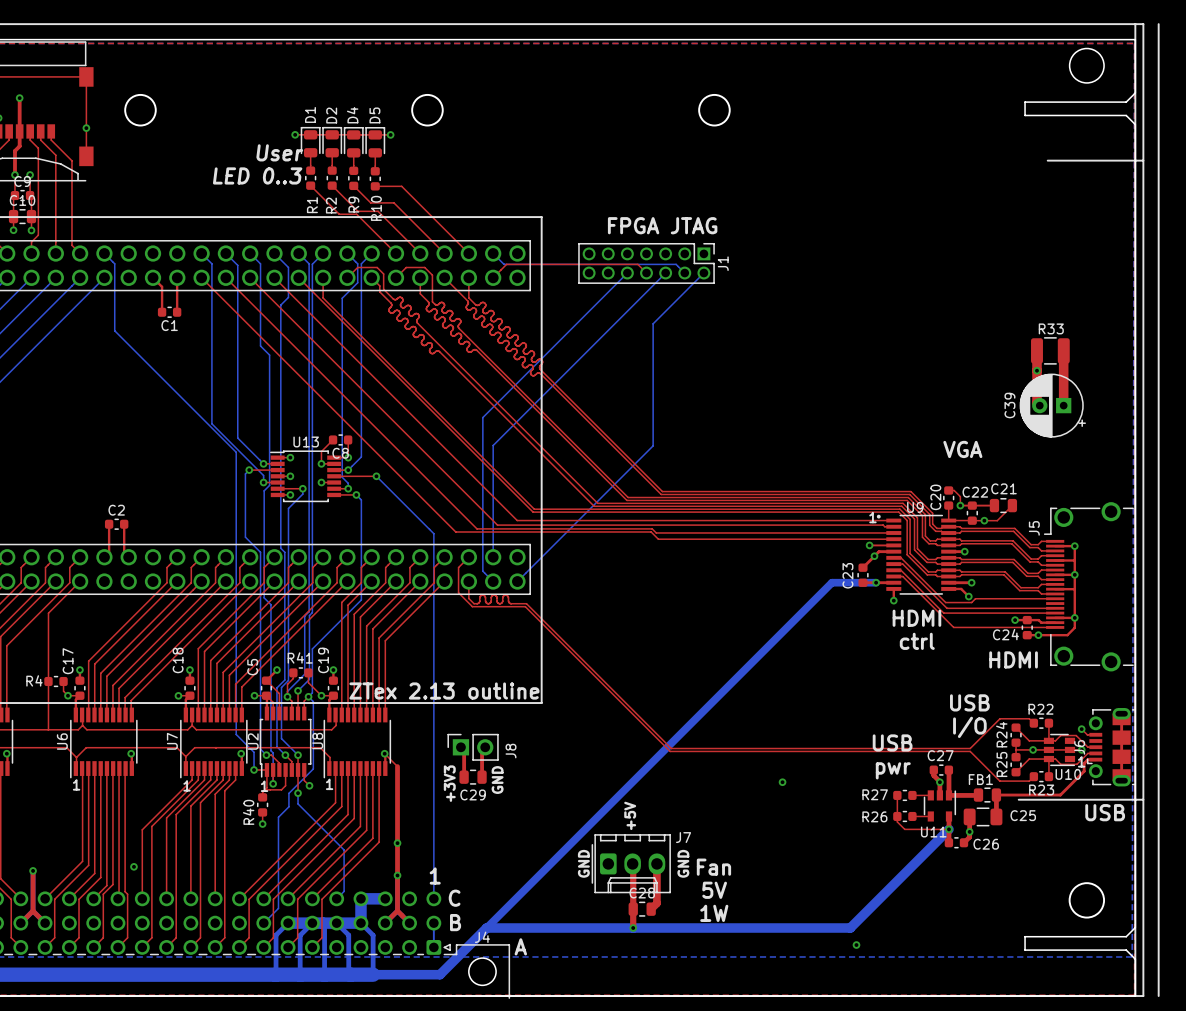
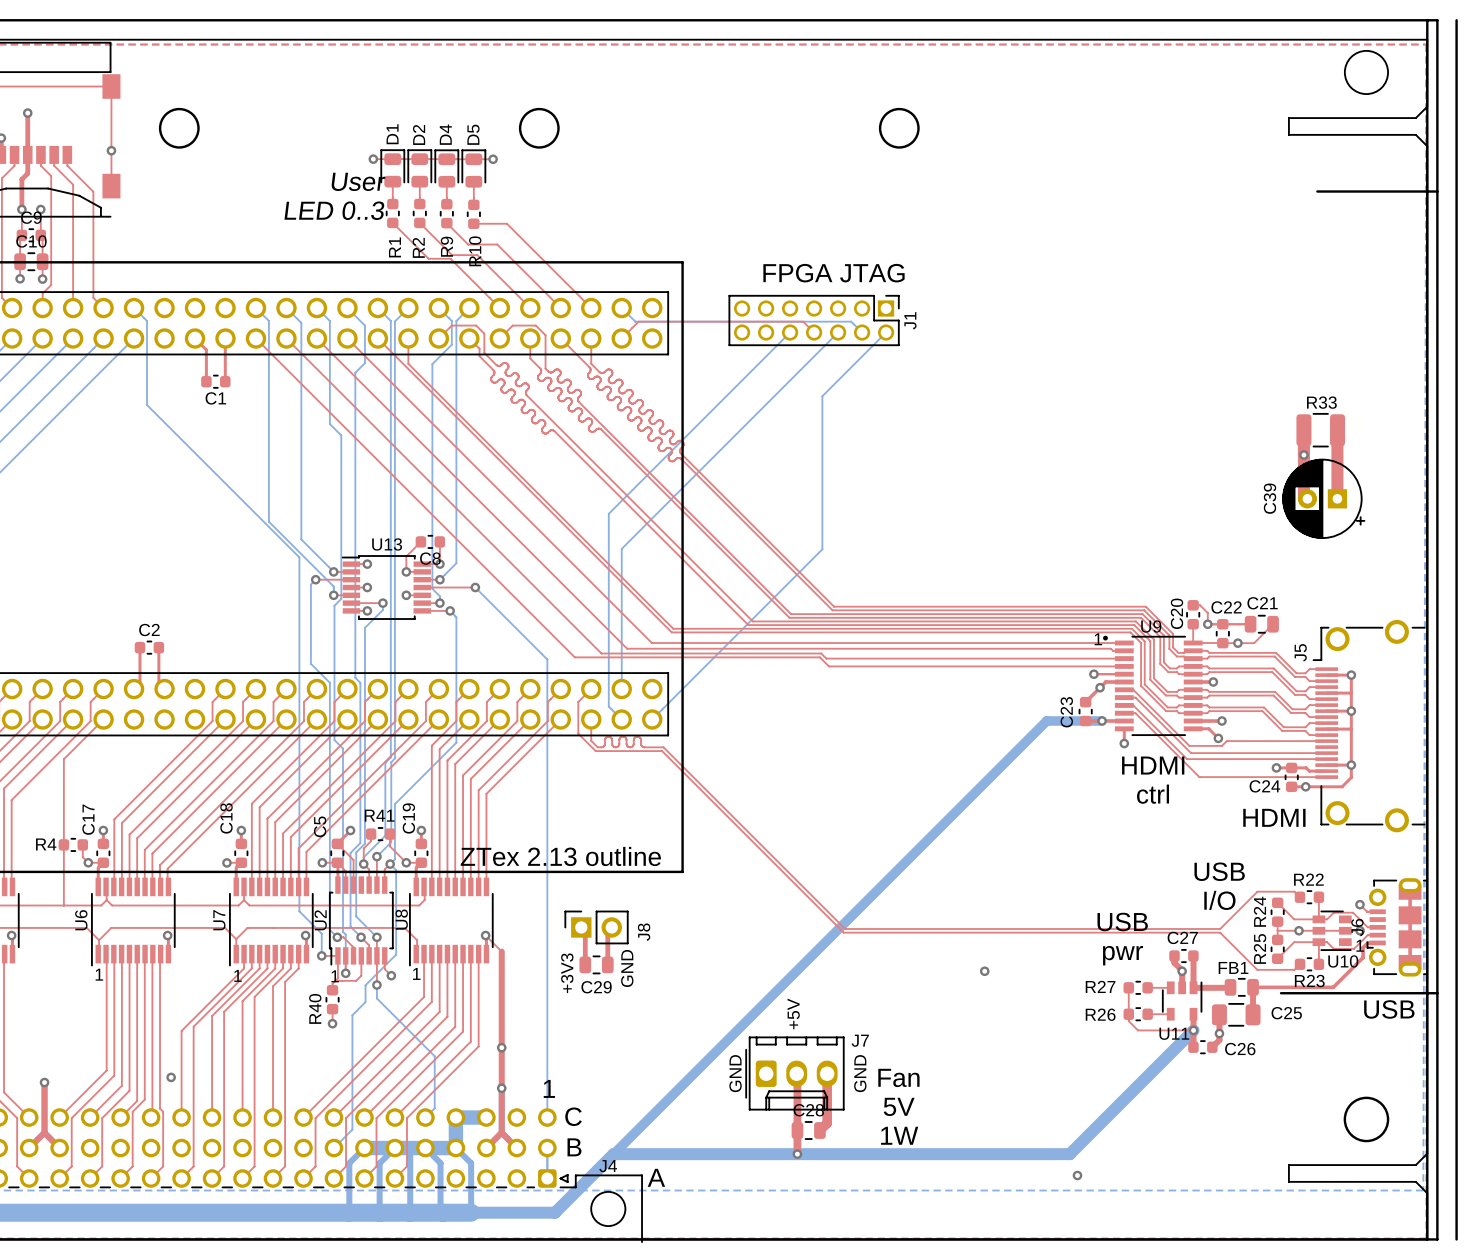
text: VGA (962, 449) -> none

